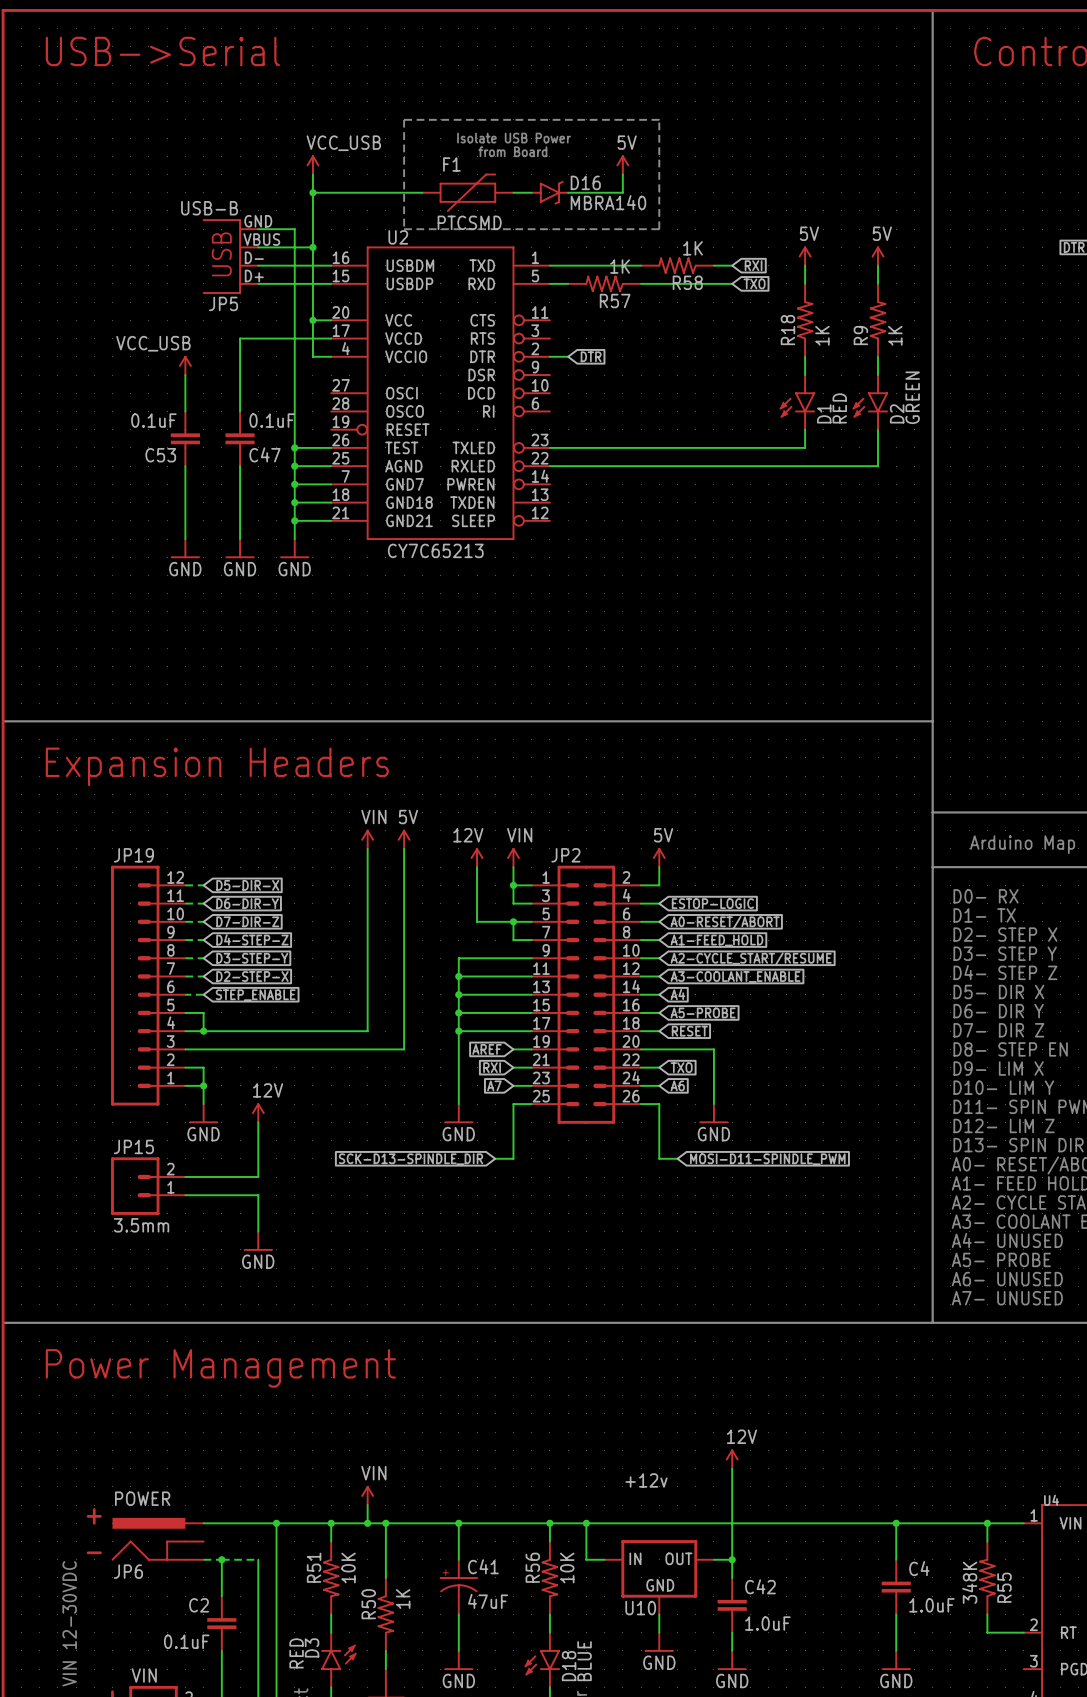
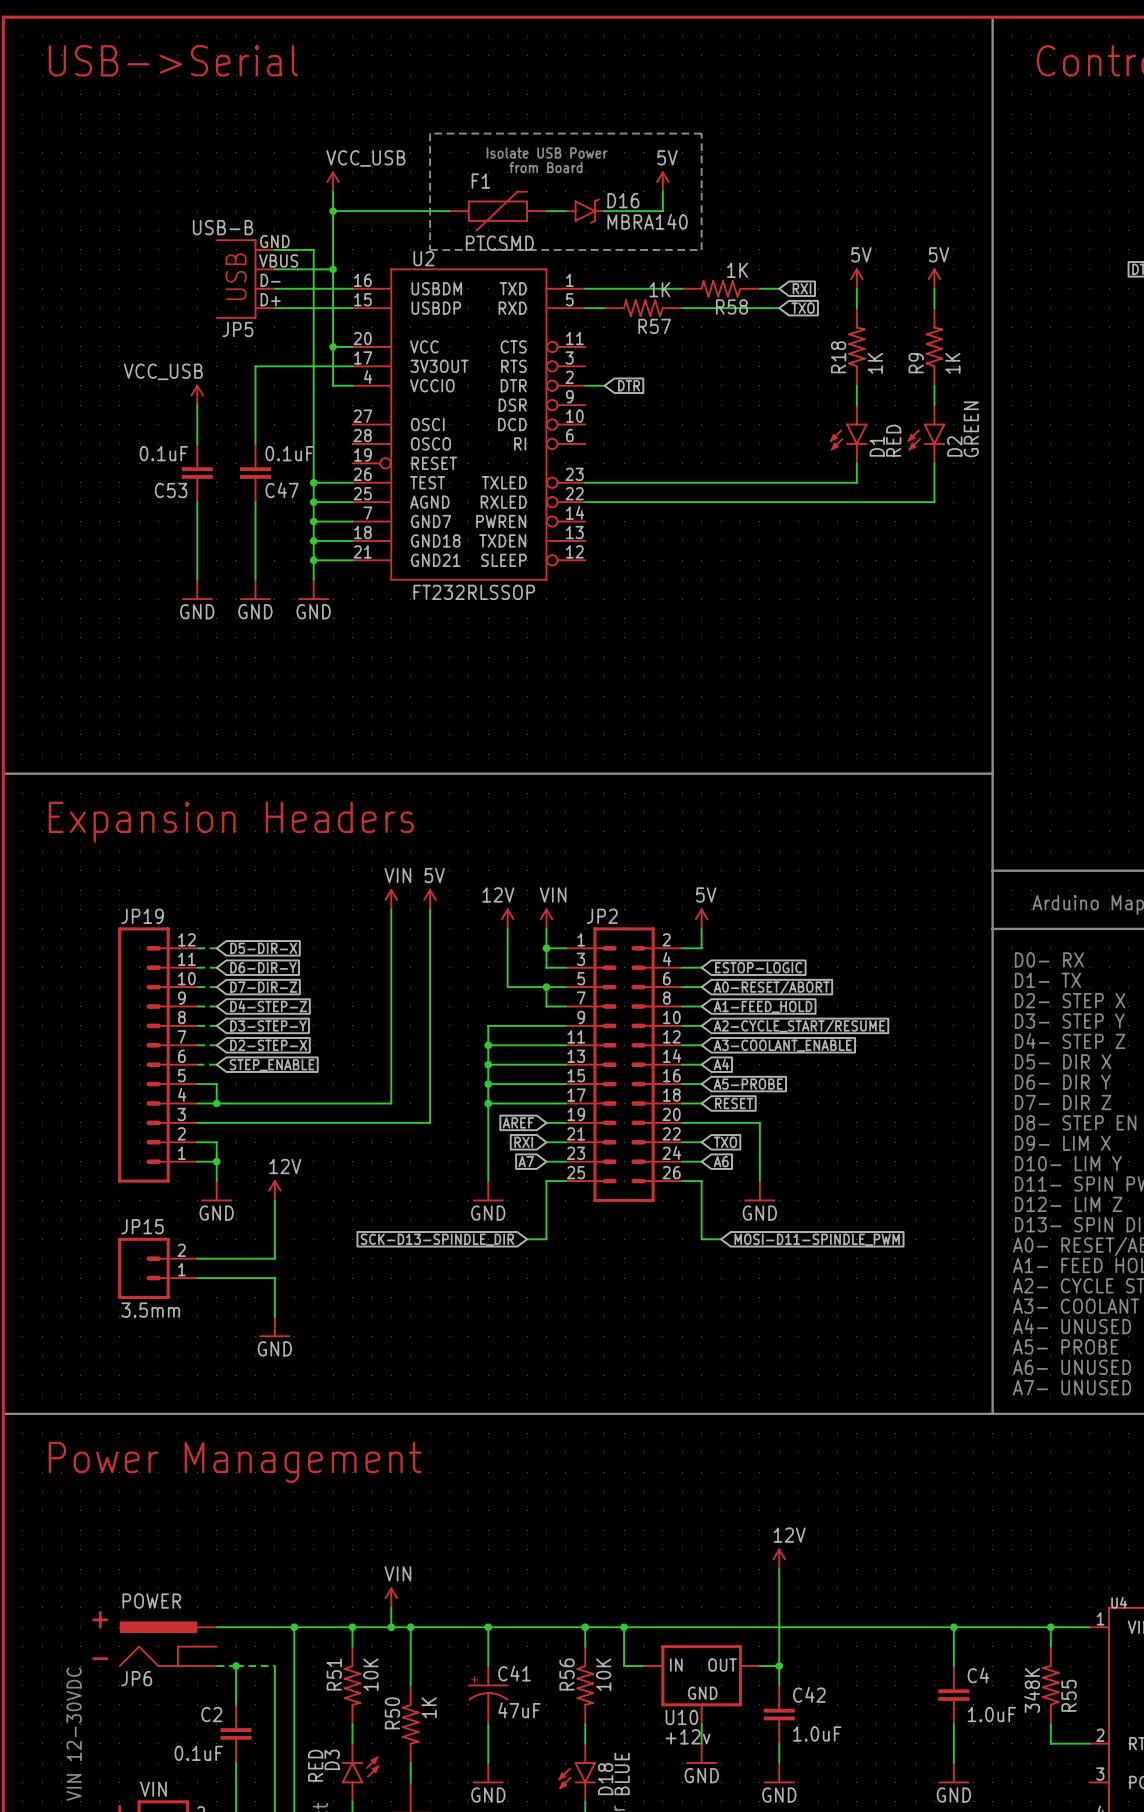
U2 pin name: VCCD (403, 338) -> 3V3OUT (439, 366)
U2 value: CY7C65213 (435, 550) -> FT232RLSSOP (474, 592)
U10 value position: +12v (646, 1480) -> +12v (688, 1736)

